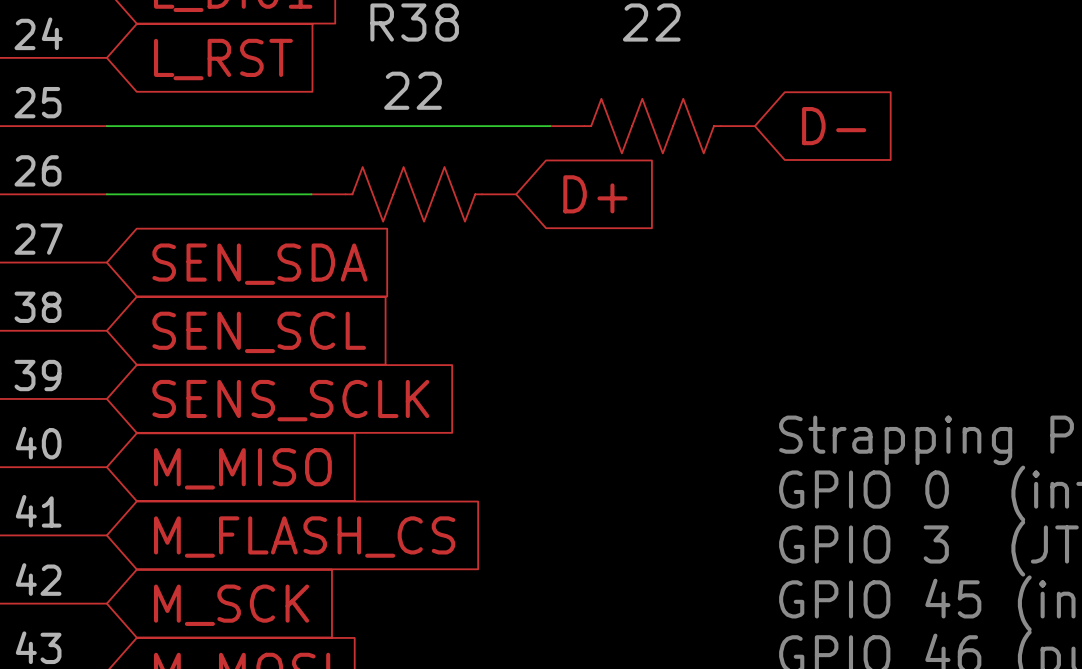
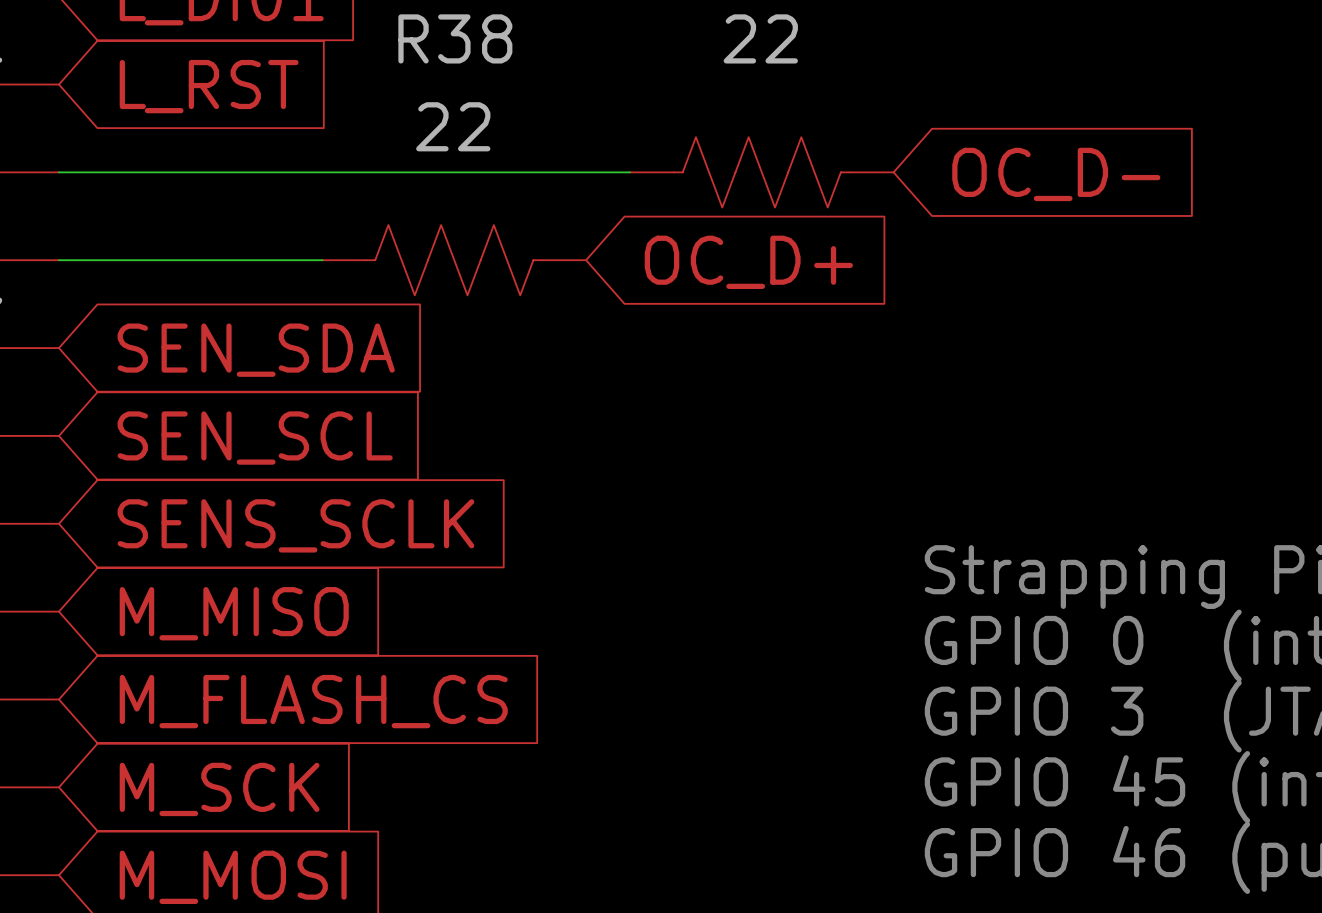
global label: D- (834, 126) -> OC_D- (1056, 174)
global label: D+ (595, 194) -> OC_D+ (748, 262)

